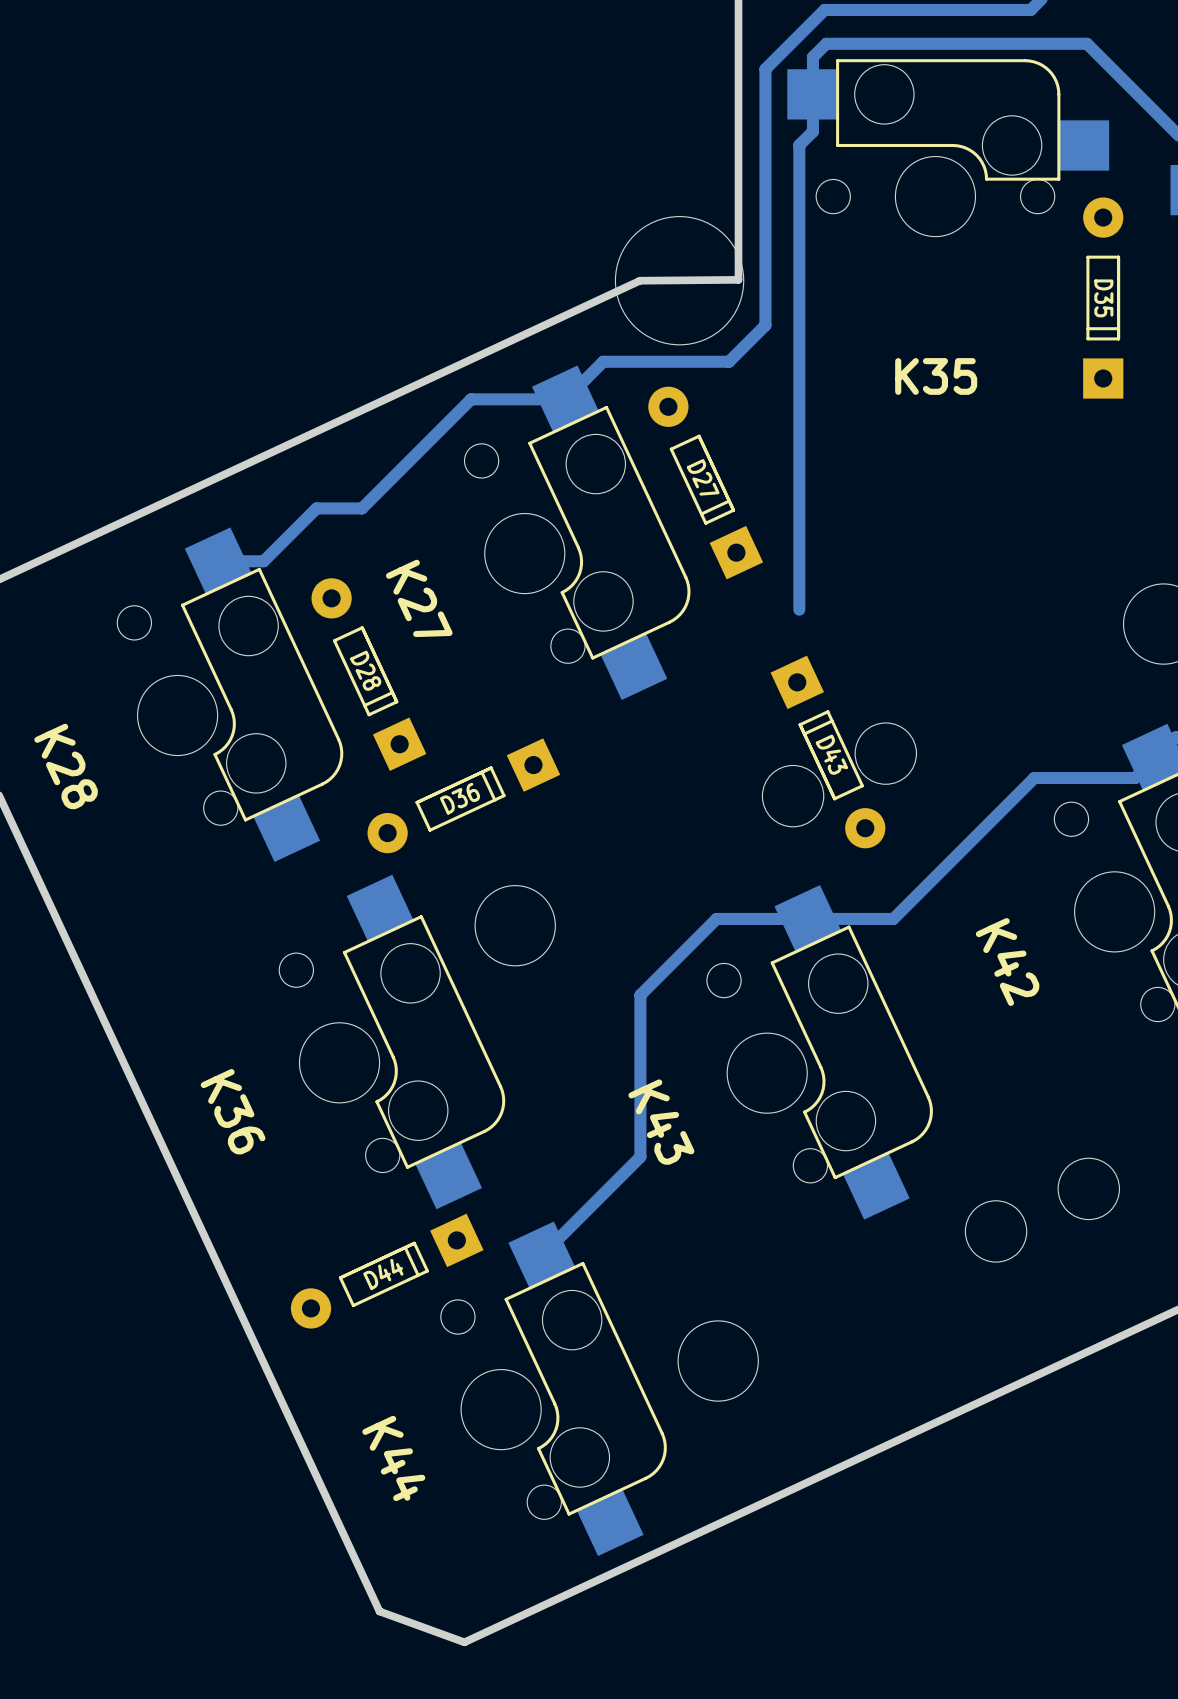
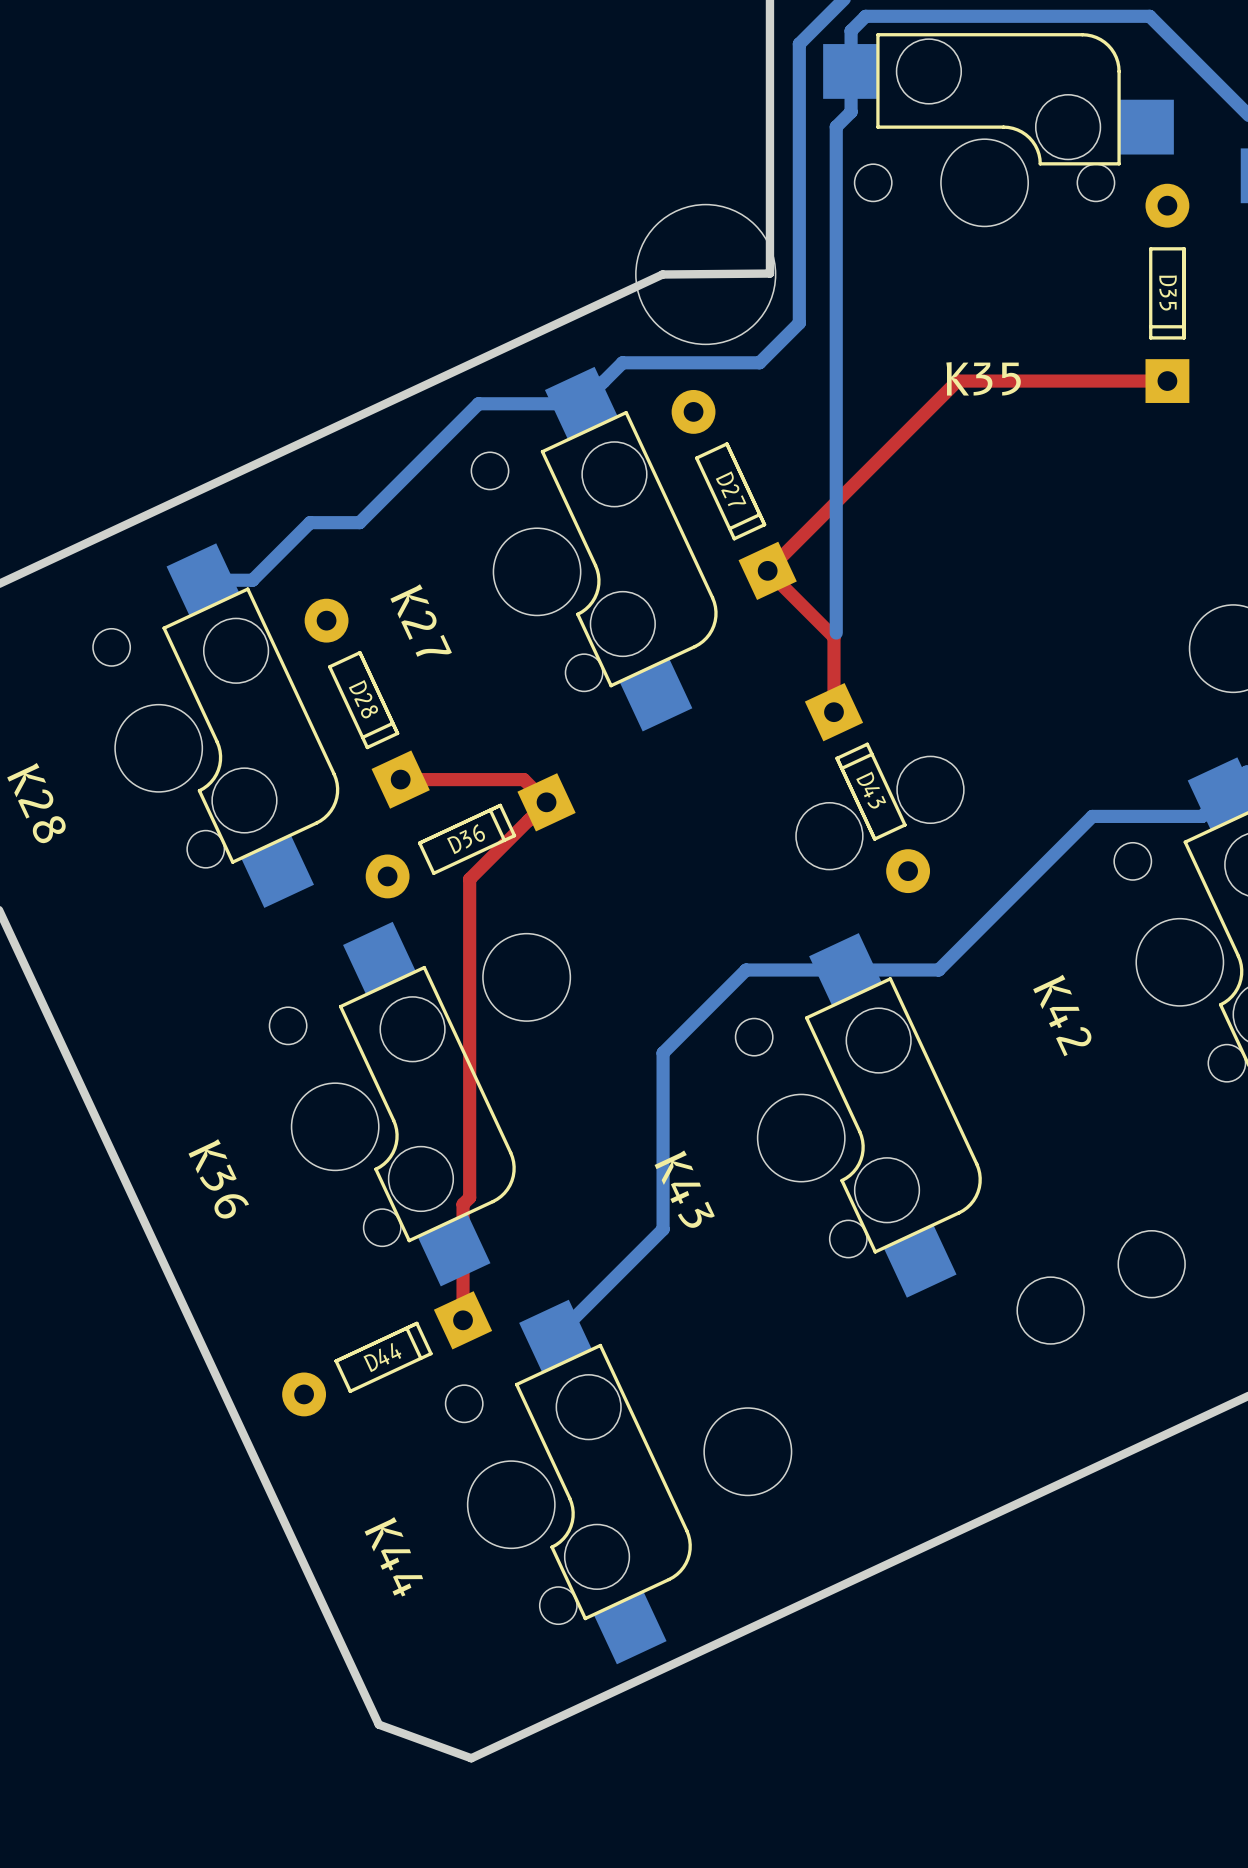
top track: none -> (1167, 381) (957, 381) (767, 570) (833, 637) (833, 712)
top track: none -> (400, 779) (523, 779) (546, 802) (469, 879) (469, 1197) (463, 1204) (463, 1320)

